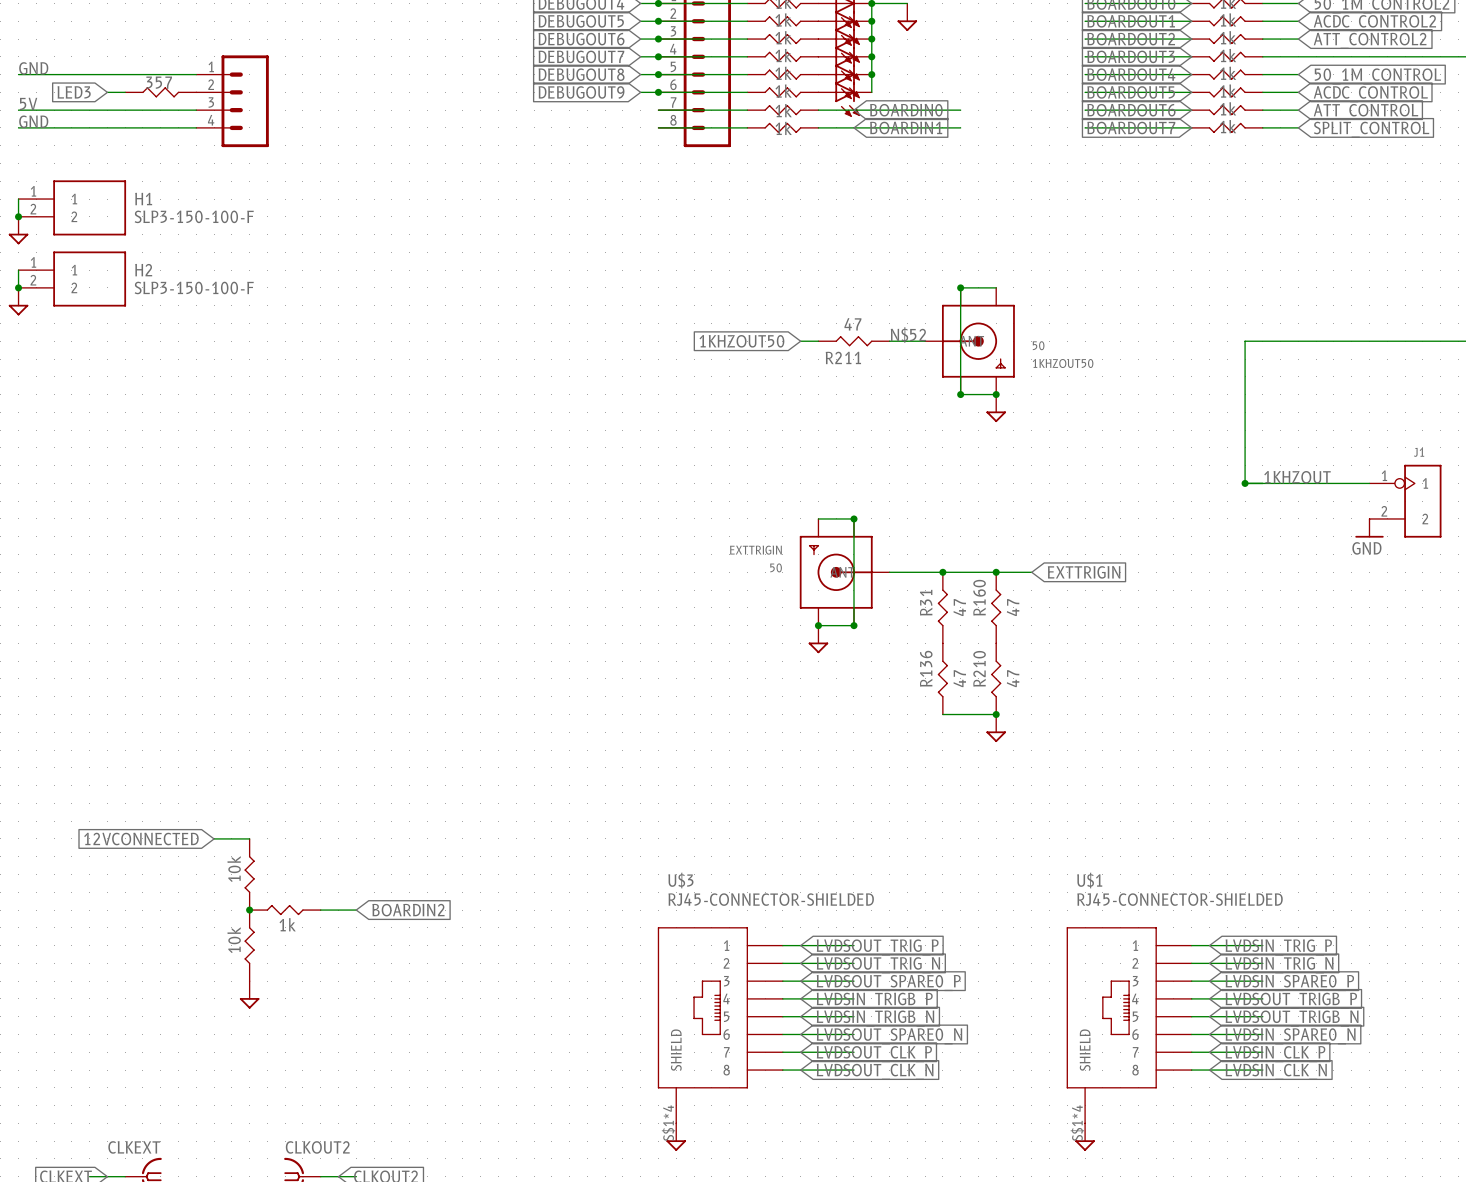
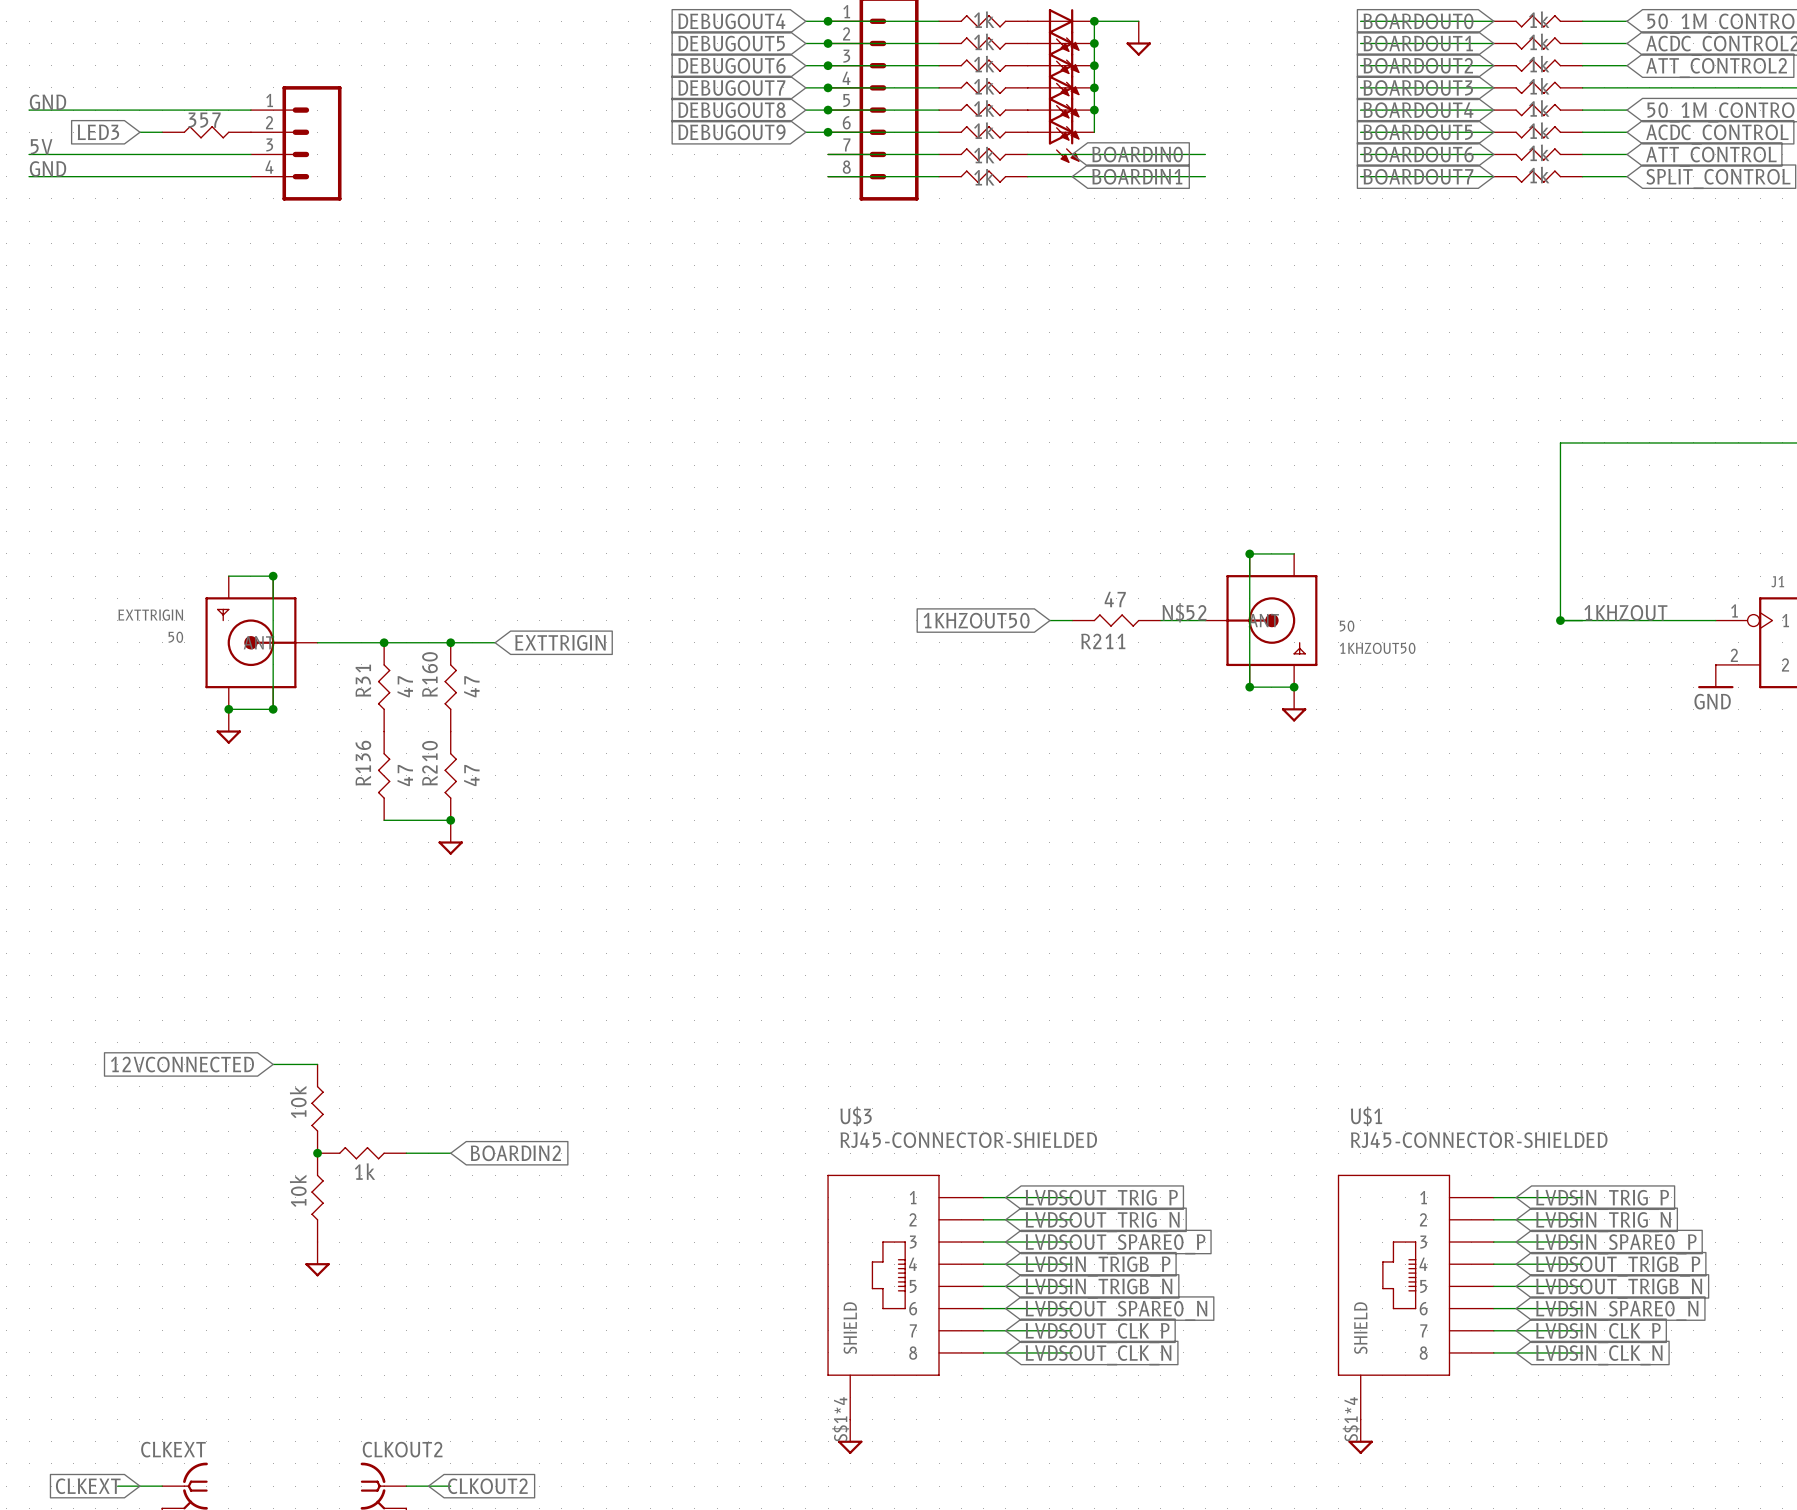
wire: (18, 199) (18, 216) -> none
H1: SLP3-150-100-F (72, 207) -> none
junction: (18, 216) -> none
power symbol: (18, 230) -> none
wire: (18, 270) (18, 287) -> none
H2: SLP3-150-100-F (72, 279) -> none
junction: (18, 287) -> none
junction: (960, 287) -> none
wire: (996, 287) (960, 287) (960, 394) (996, 394) -> (1294, 553) (1249, 553) (1249, 687) (1294, 687)
power symbol: (18, 301) -> none
label position: N$52 (908, 335) -> N$52 (1184, 612)
global label position: 1KHZOUT50 (741, 341) -> 1KHZOUT50 (976, 620)
wire: (800, 341) (818, 341) -> (1049, 620) (1072, 620)
R211 position: (853, 341) -> (1116, 620)
wire: (889, 341) (925, 341) -> (1160, 620) (1205, 620)
1KHZOUT50 position: (969, 341) -> (1261, 620)
junction: (960, 394) -> none
junction: (996, 394) -> none
power symbol: (996, 408) -> none
junction: none -> (1249, 553)
wire: none -> (228, 576) (273, 576) (273, 709) (228, 709)
junction: none -> (273, 576)
EXTTRIGIN: none -> 50 (261, 642)
wire: none -> (317, 642) (495, 642)
junction: none -> (384, 642)
junction: none -> (450, 642)
global label: none -> EXTTRIGIN (560, 642)
wire: (818, 518) (853, 518) (853, 625) (818, 625) -> none
junction: (853, 518) -> none
junction: none -> (1249, 687)
junction: none -> (1294, 687)
power symbol: none -> (1294, 704)
junction: none -> (228, 709)
junction: none -> (273, 709)
power symbol: none -> (228, 726)
EXTTRIGIN: 50 (844, 572) -> none
wire: (889, 572) (1031, 572) -> none
junction: (942, 572) -> none
junction: (996, 572) -> none
global label: EXTTRIGIN (1084, 572) -> none
R31 position: (942, 607) -> (384, 687)
R160 position: (996, 607) -> (450, 687)
junction: (818, 625) -> none
junction: (853, 625) -> none
power symbol: (818, 639) -> none
wire: none -> (384, 820) (450, 820)
junction: none -> (450, 820)
power symbol: none -> (450, 837)
R136 position: (942, 678) -> (384, 775)
R210 position: (996, 678) -> (450, 775)
wire: (942, 714) (996, 714) -> none
junction: (996, 714) -> none
power symbol: (996, 728) -> none

